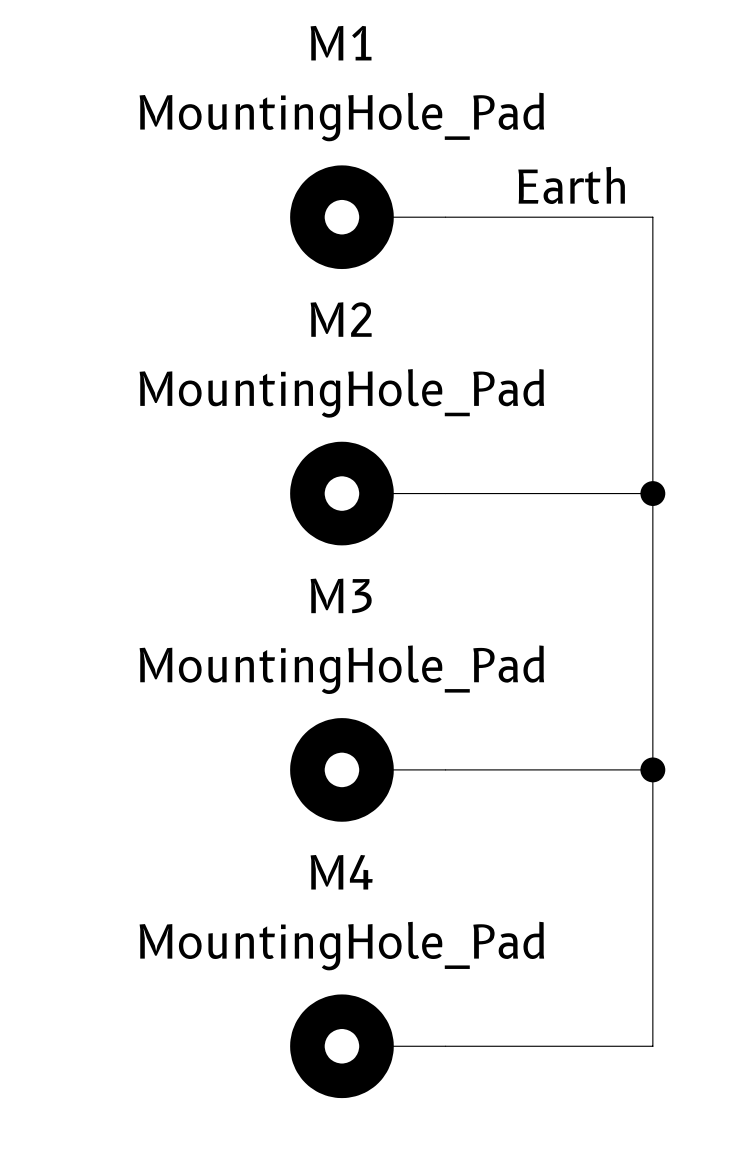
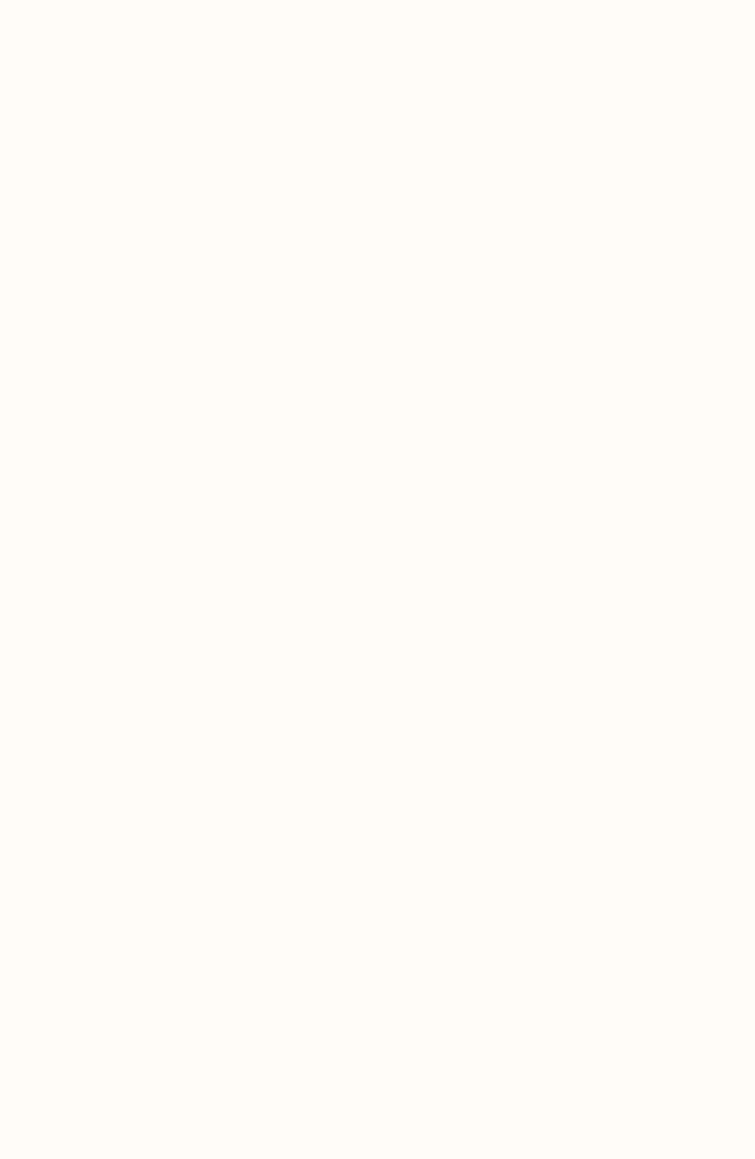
label: Earth (571, 185) -> none
M1: MountingHole_Pad (367, 217) -> none
wire: (445, 217) (652, 217) (652, 1046) (445, 1046) -> none
M2: MountingHole_Pad (367, 493) -> none
wire: (445, 493) (652, 493) -> none
junction: (652, 493) -> none
M3: MountingHole_Pad (367, 769) -> none
wire: (445, 769) (652, 769) -> none
junction: (652, 769) -> none
M4: MountingHole_Pad (367, 1046) -> none

